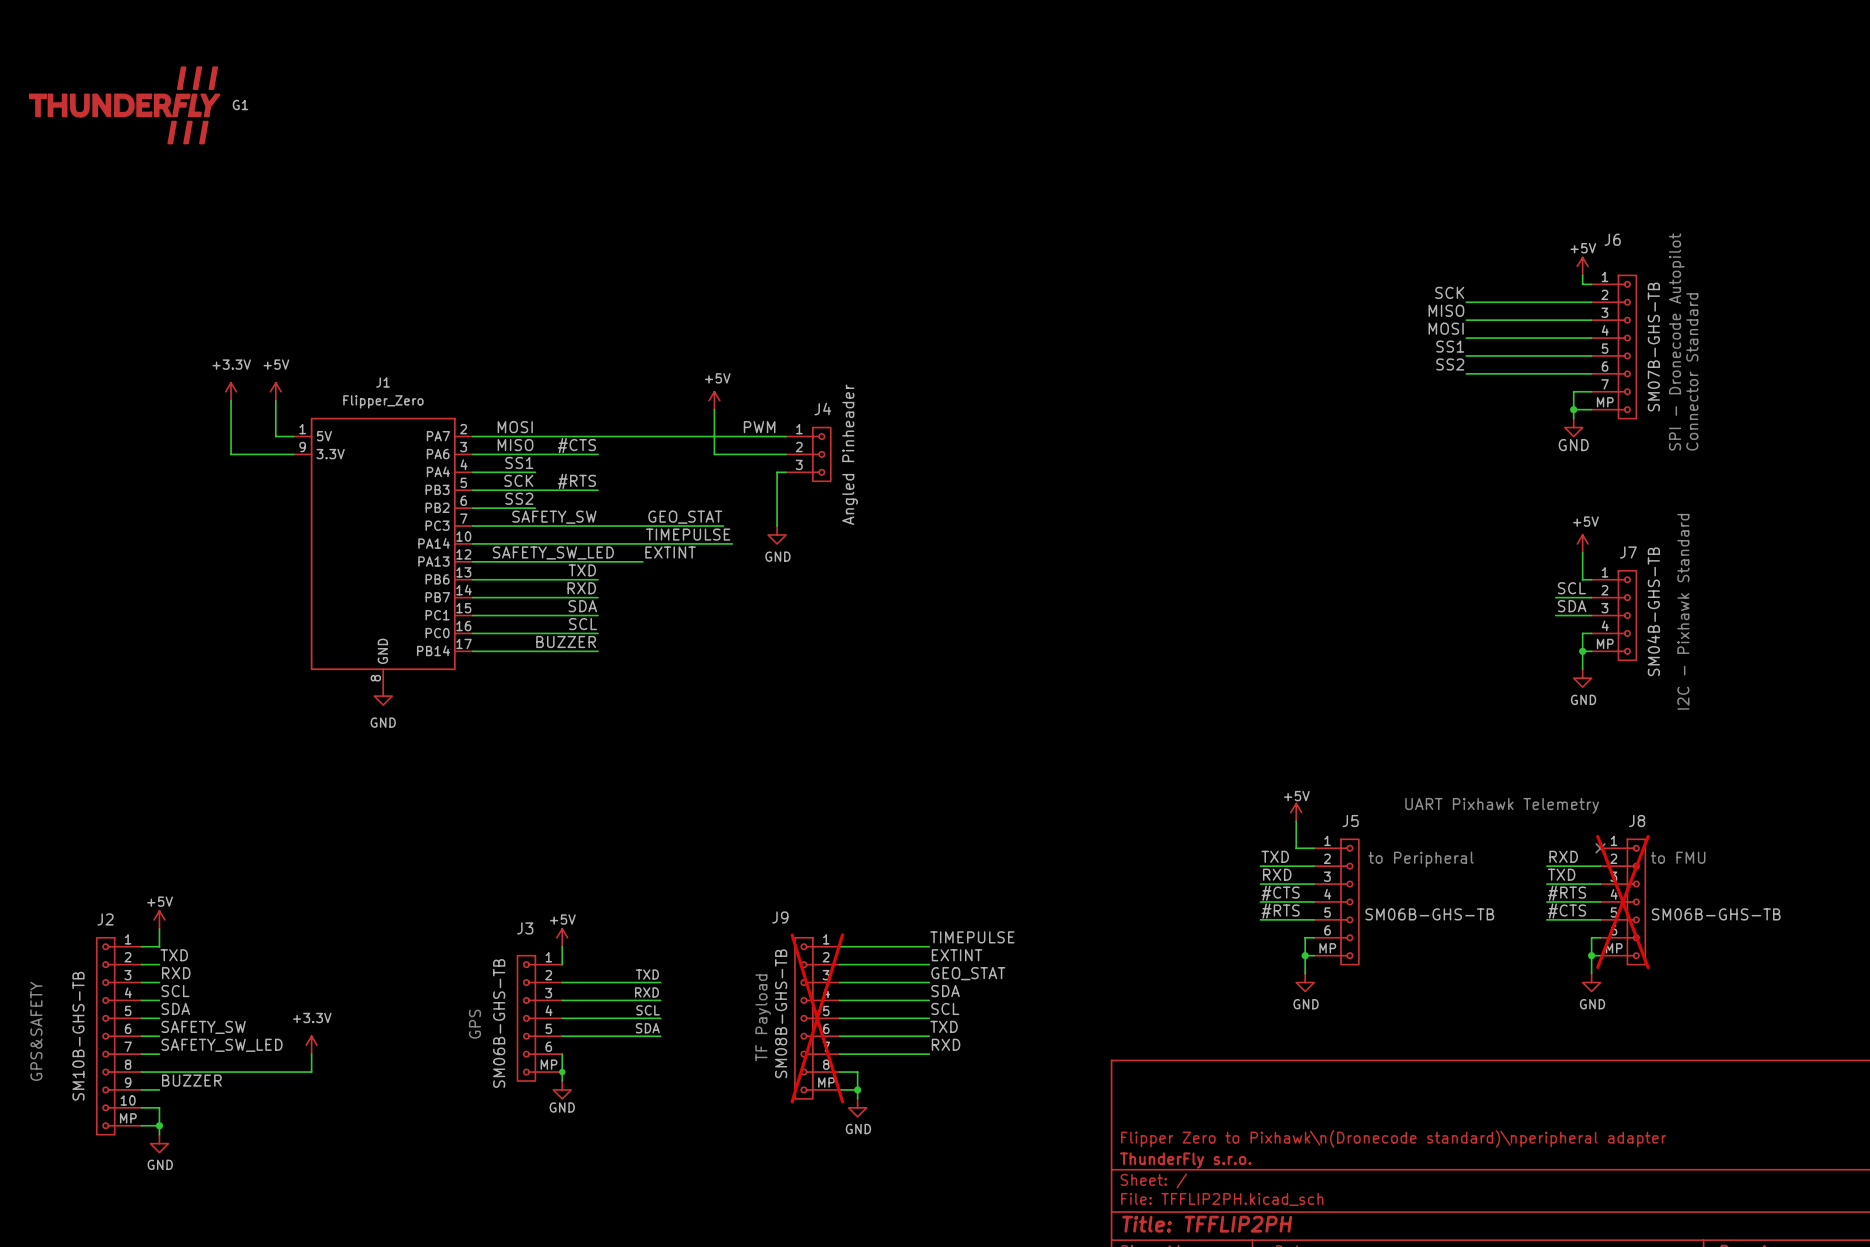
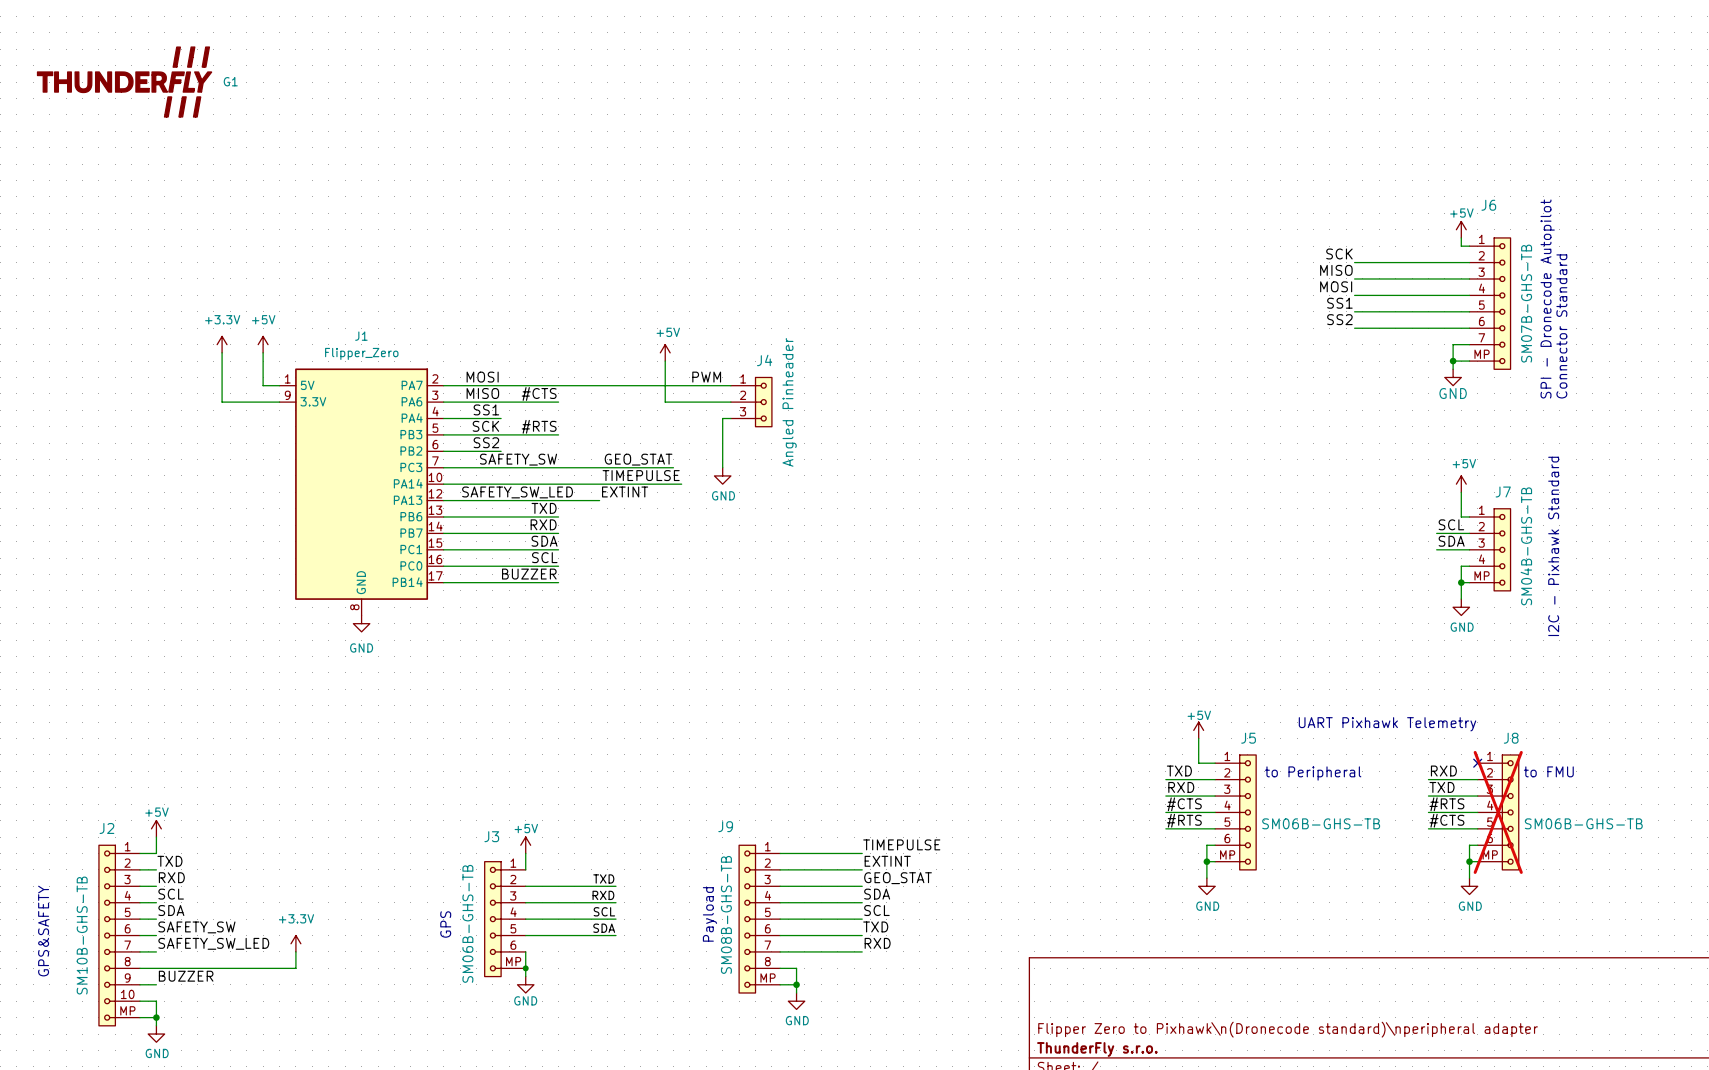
text: TF Payload (763, 1017) -> Payload (709, 914)
J9 do-not-place cross: (817, 1018) -> none

